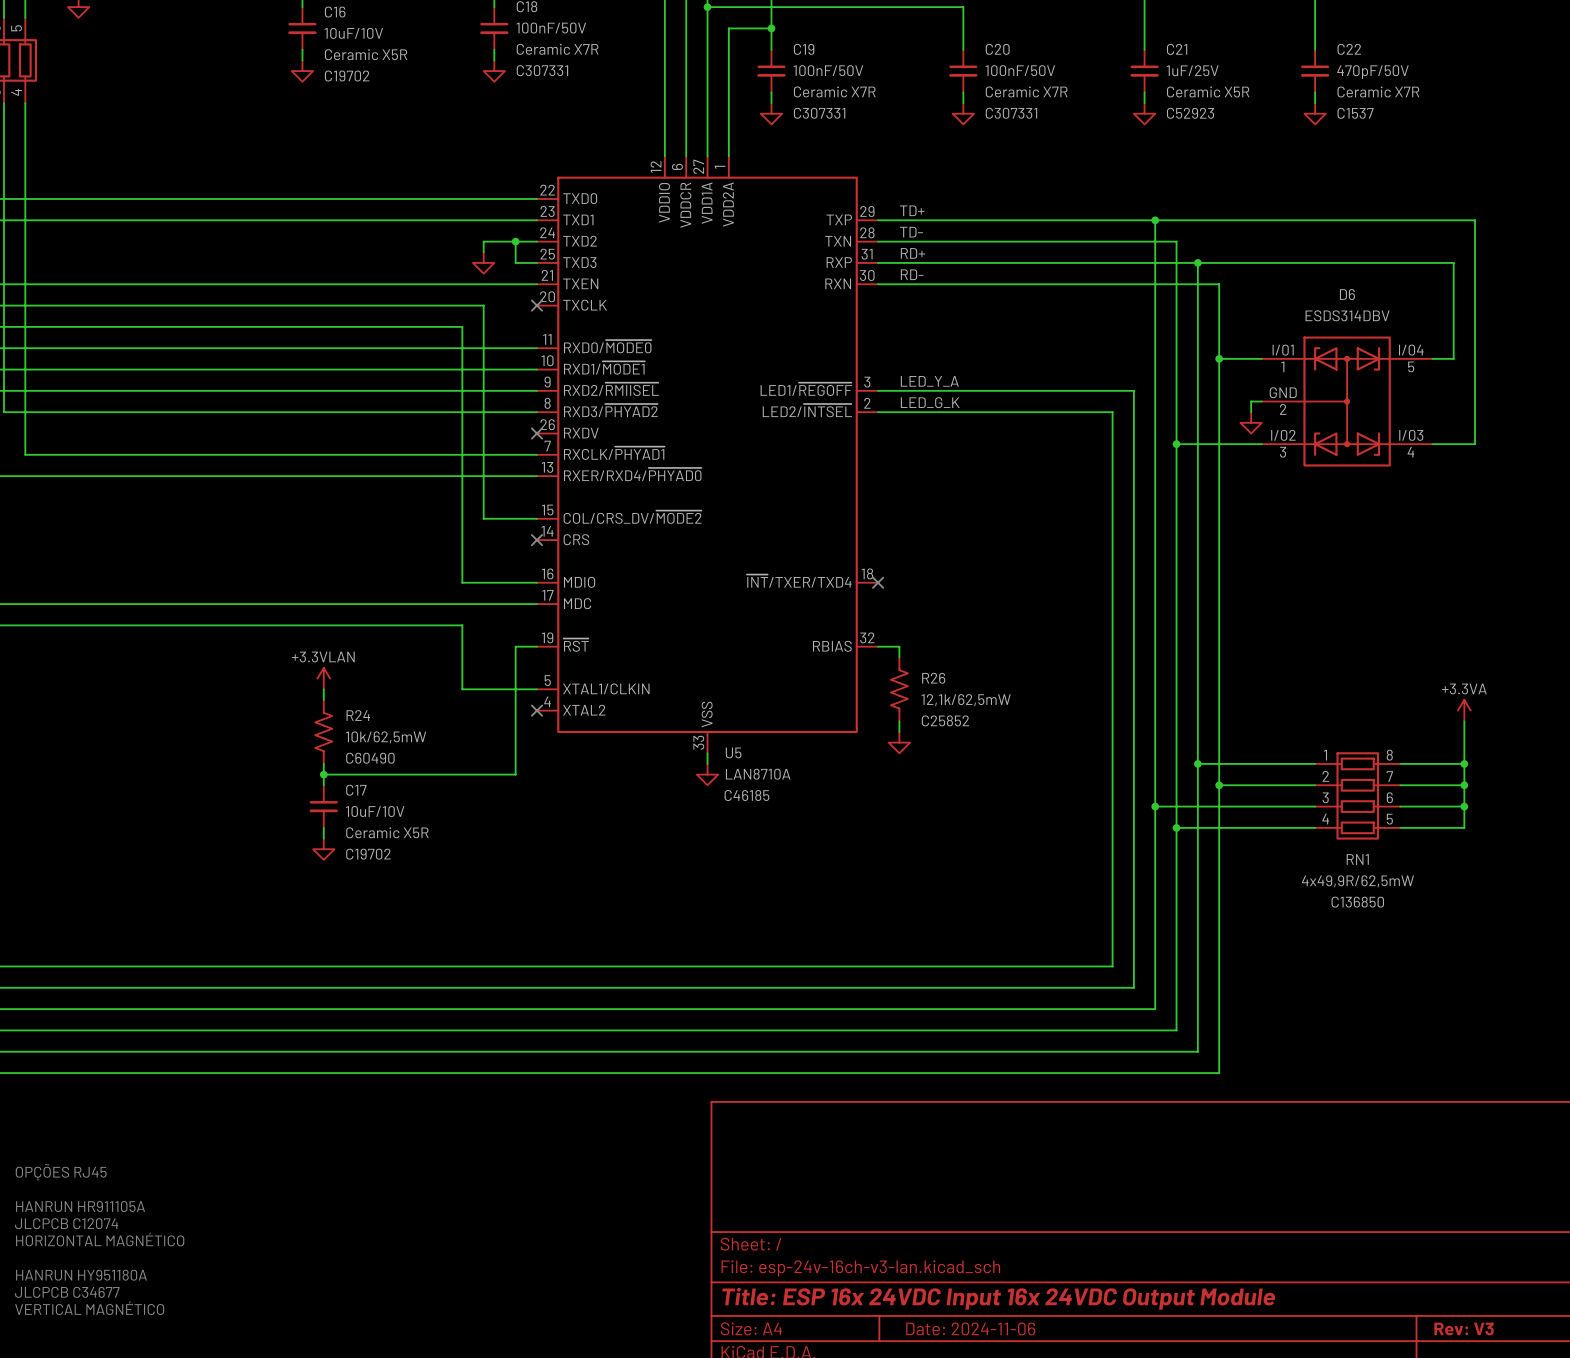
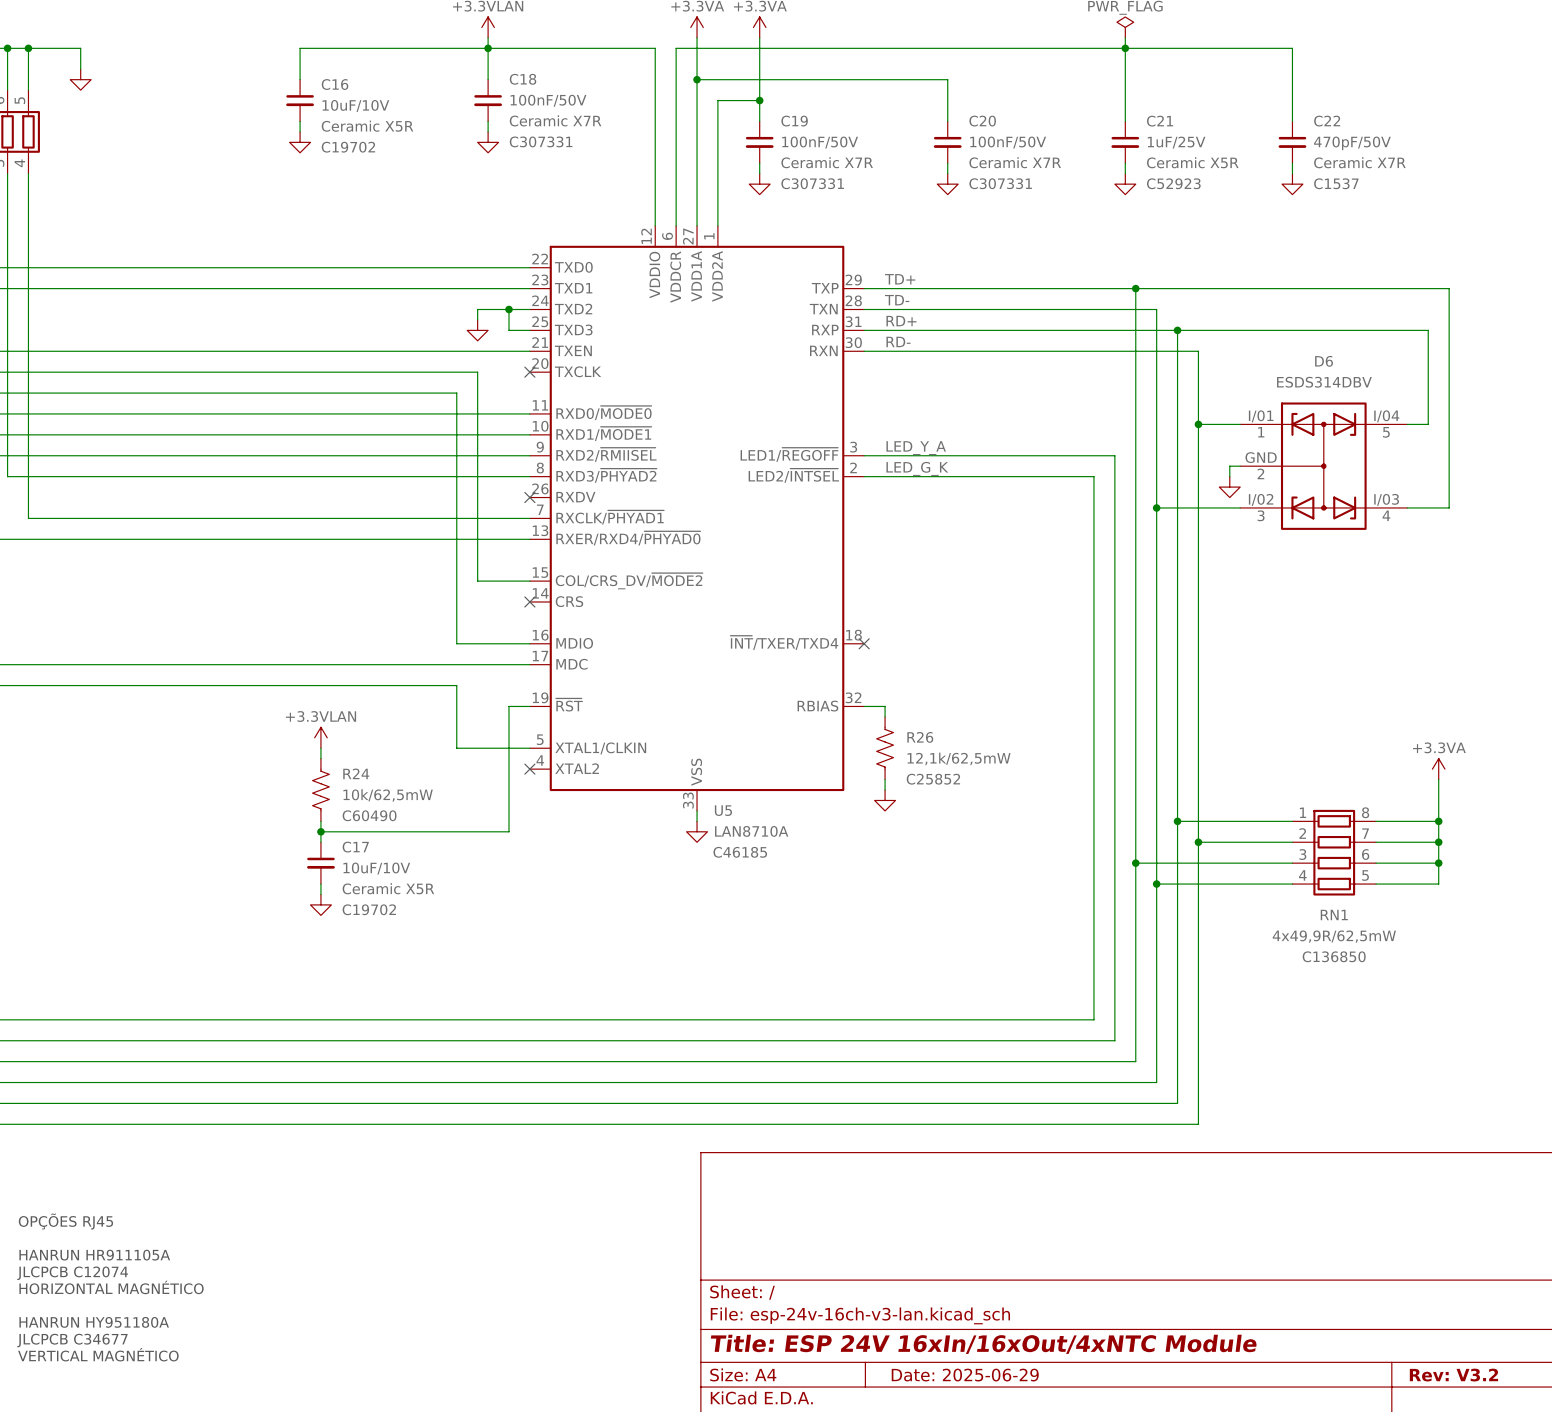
title block: Title: ESP 16x 24VDC Input 16x 24VDC Output Module (998, 1298) -> Title: ESP 24V 16xIn/16xOut/4xNTC Module (983, 1344)
title block: Date: 2024-11-06 (970, 1328) -> Date: 2025-06-29 (965, 1375)
title block: Rev: V3 (1464, 1329) -> Rev: V3.2 (1453, 1375)

